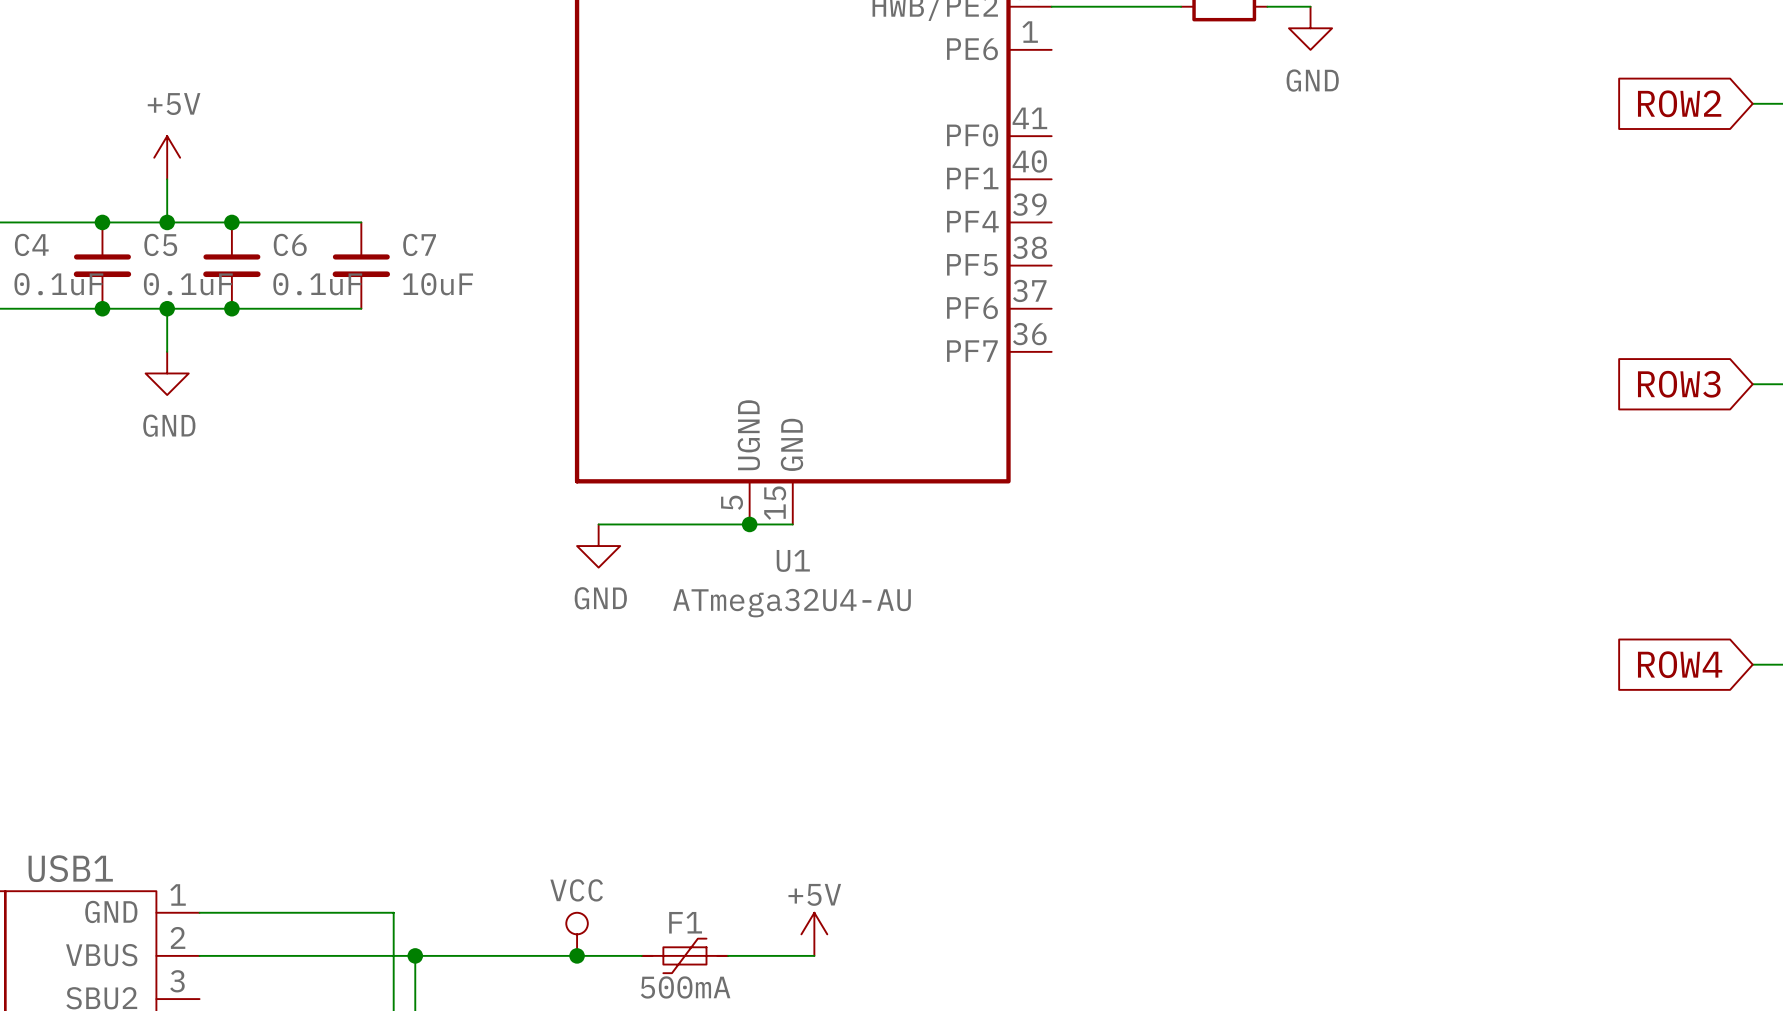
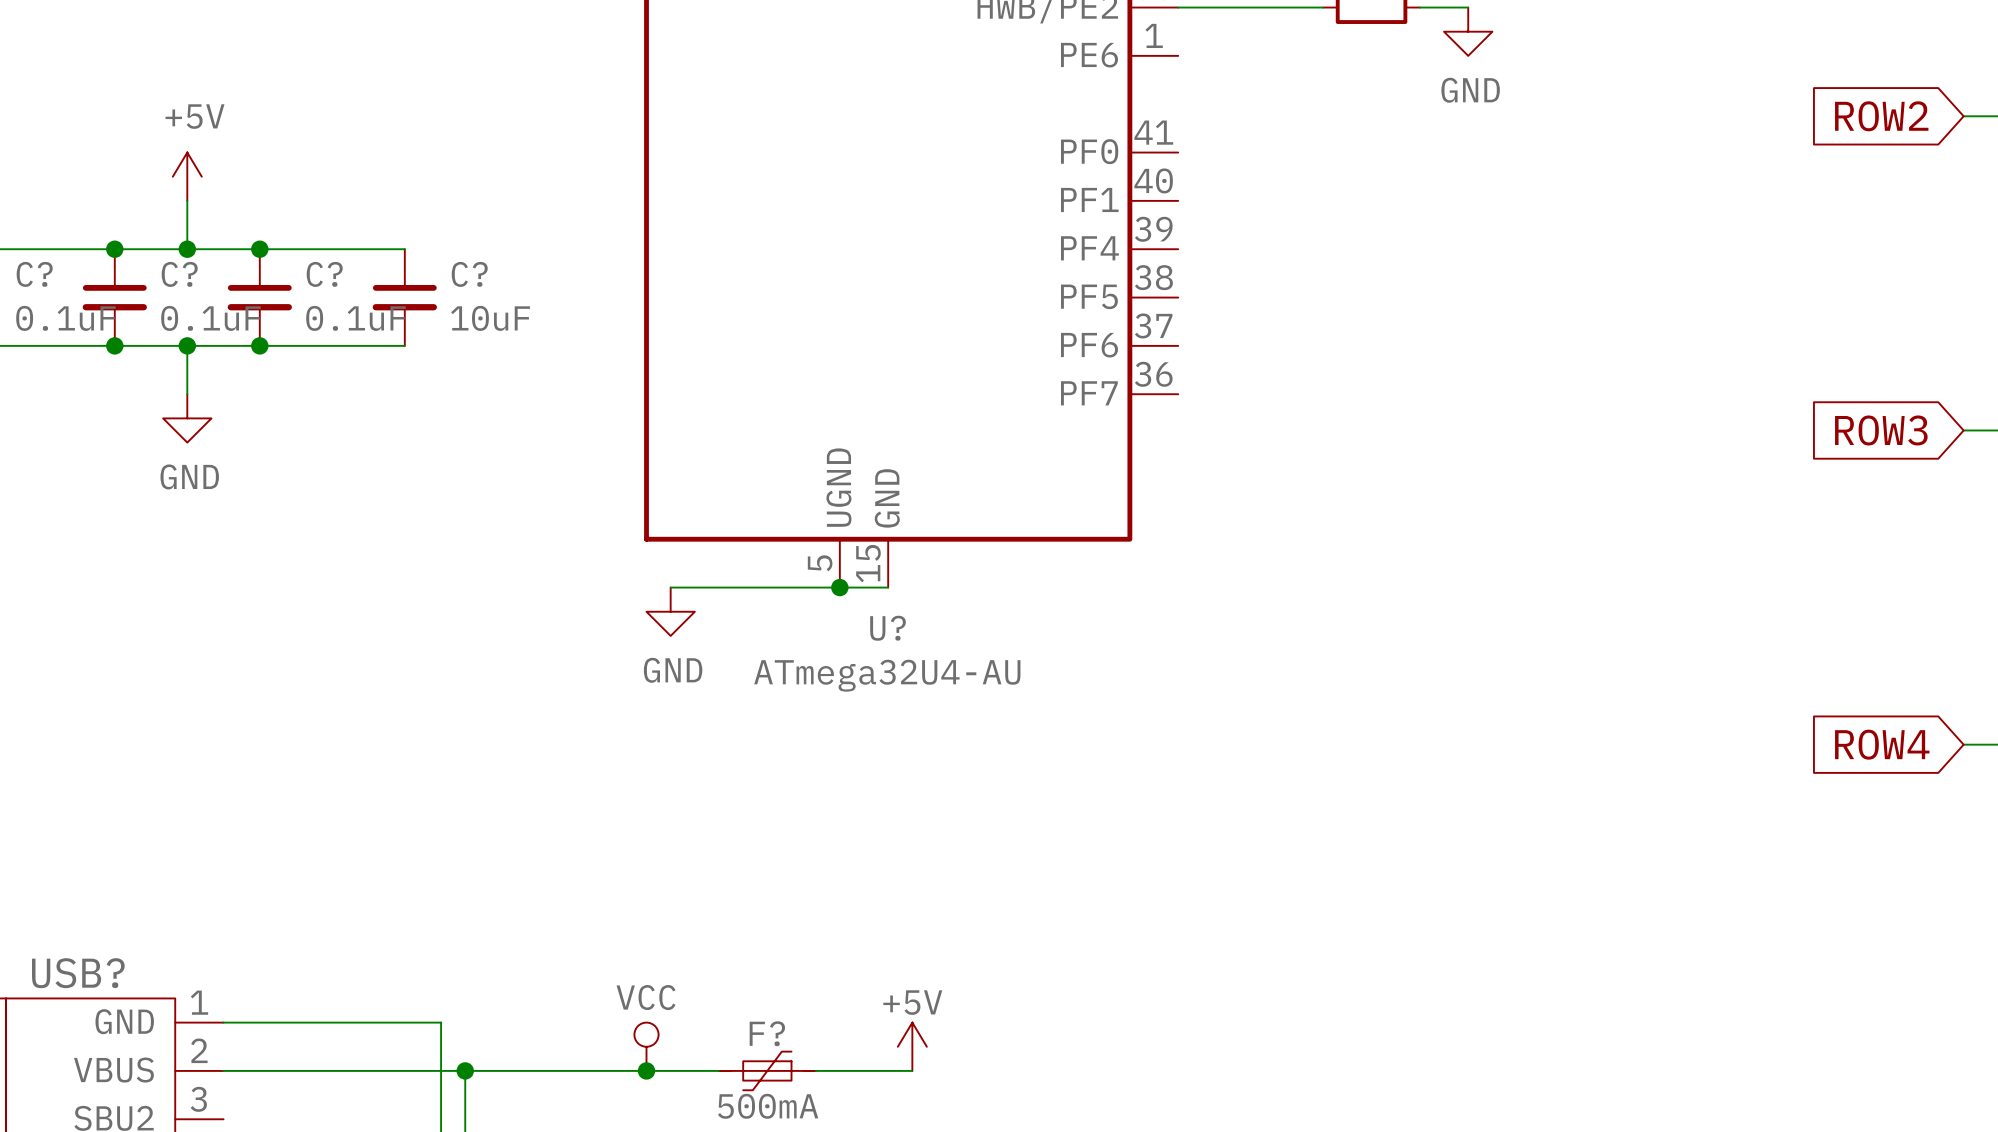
C4 name: C4 (31, 244) -> C? (34, 274)
C5 name: C5 (160, 244) -> C? (179, 274)
C6 name: C6 (290, 244) -> C? (324, 274)
C7 name: C7 (419, 244) -> C? (469, 274)
U1 name: U1 (793, 560) -> U? (888, 628)
USB1 name: USB1 (70, 868) -> USB? (78, 973)
F1 name: F1 (685, 922) -> F? (767, 1033)

